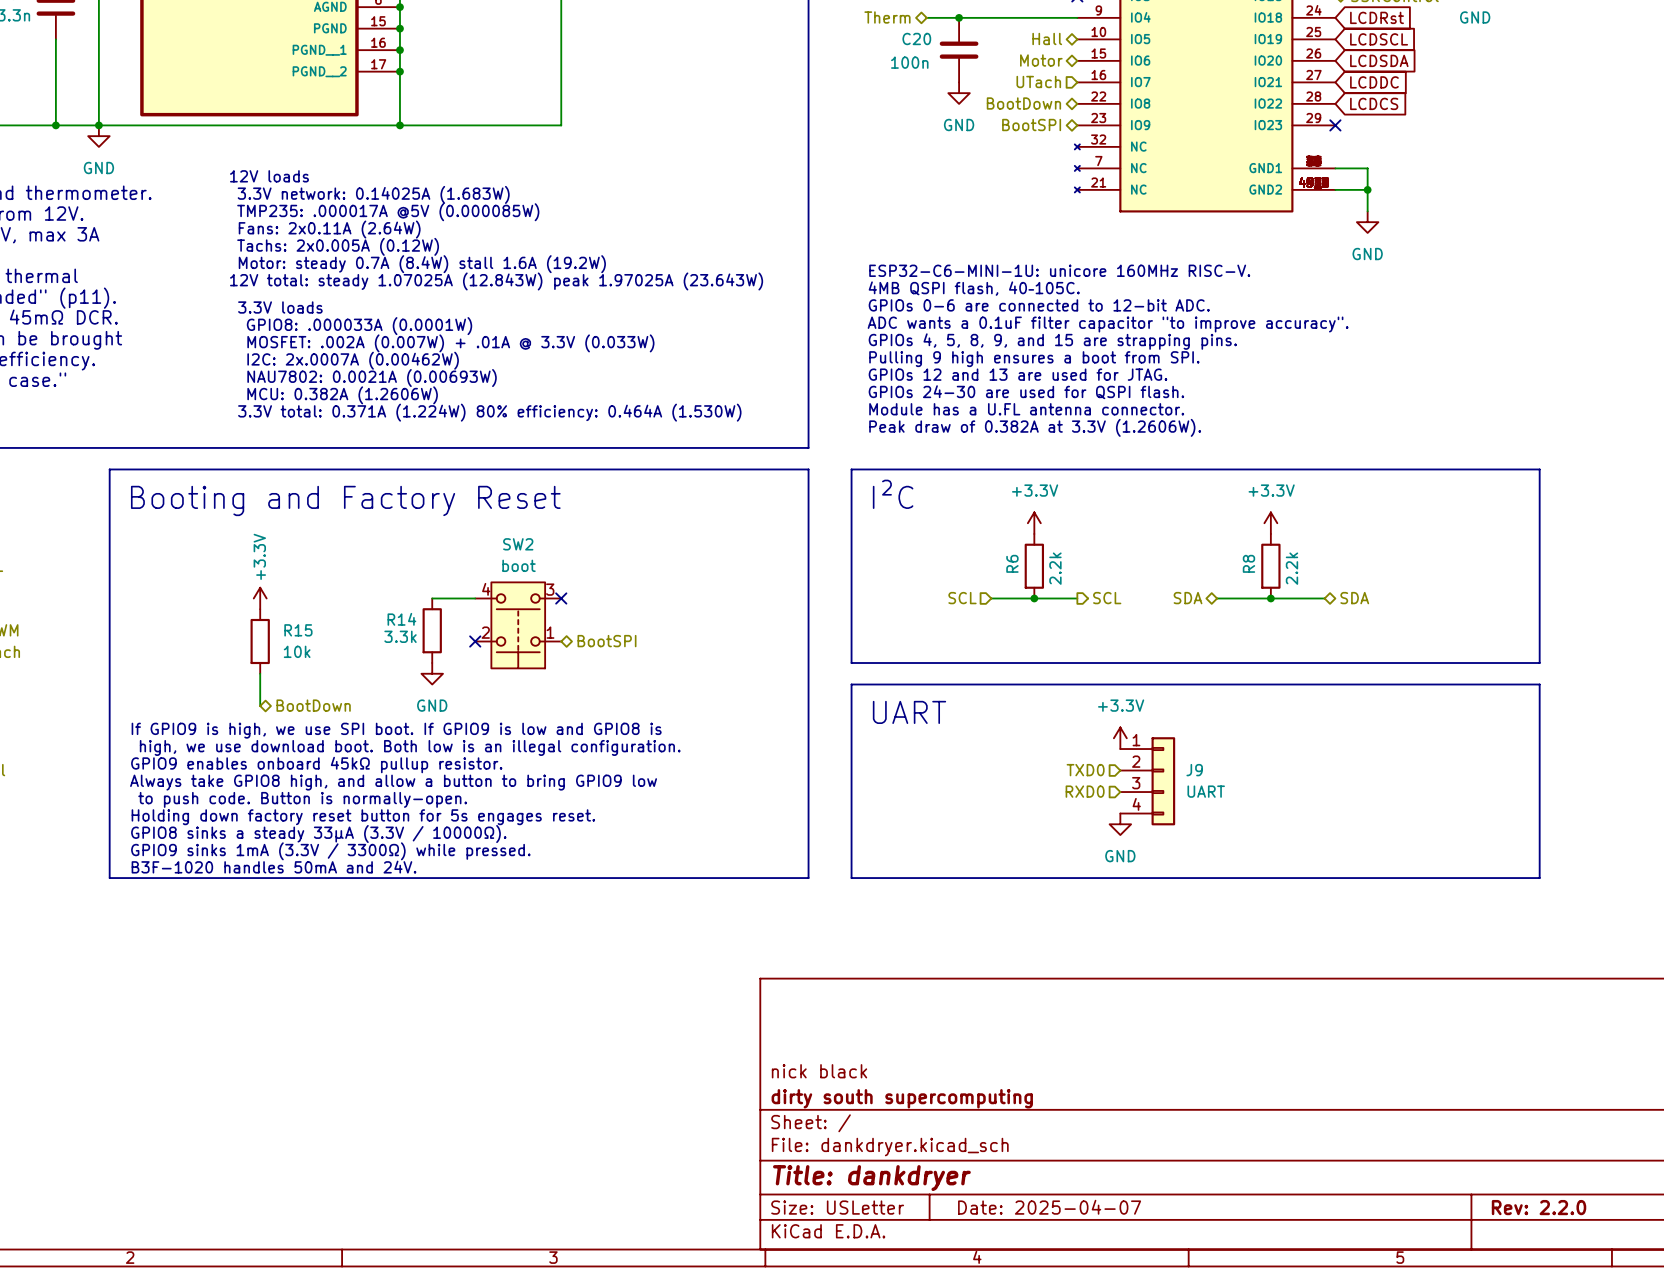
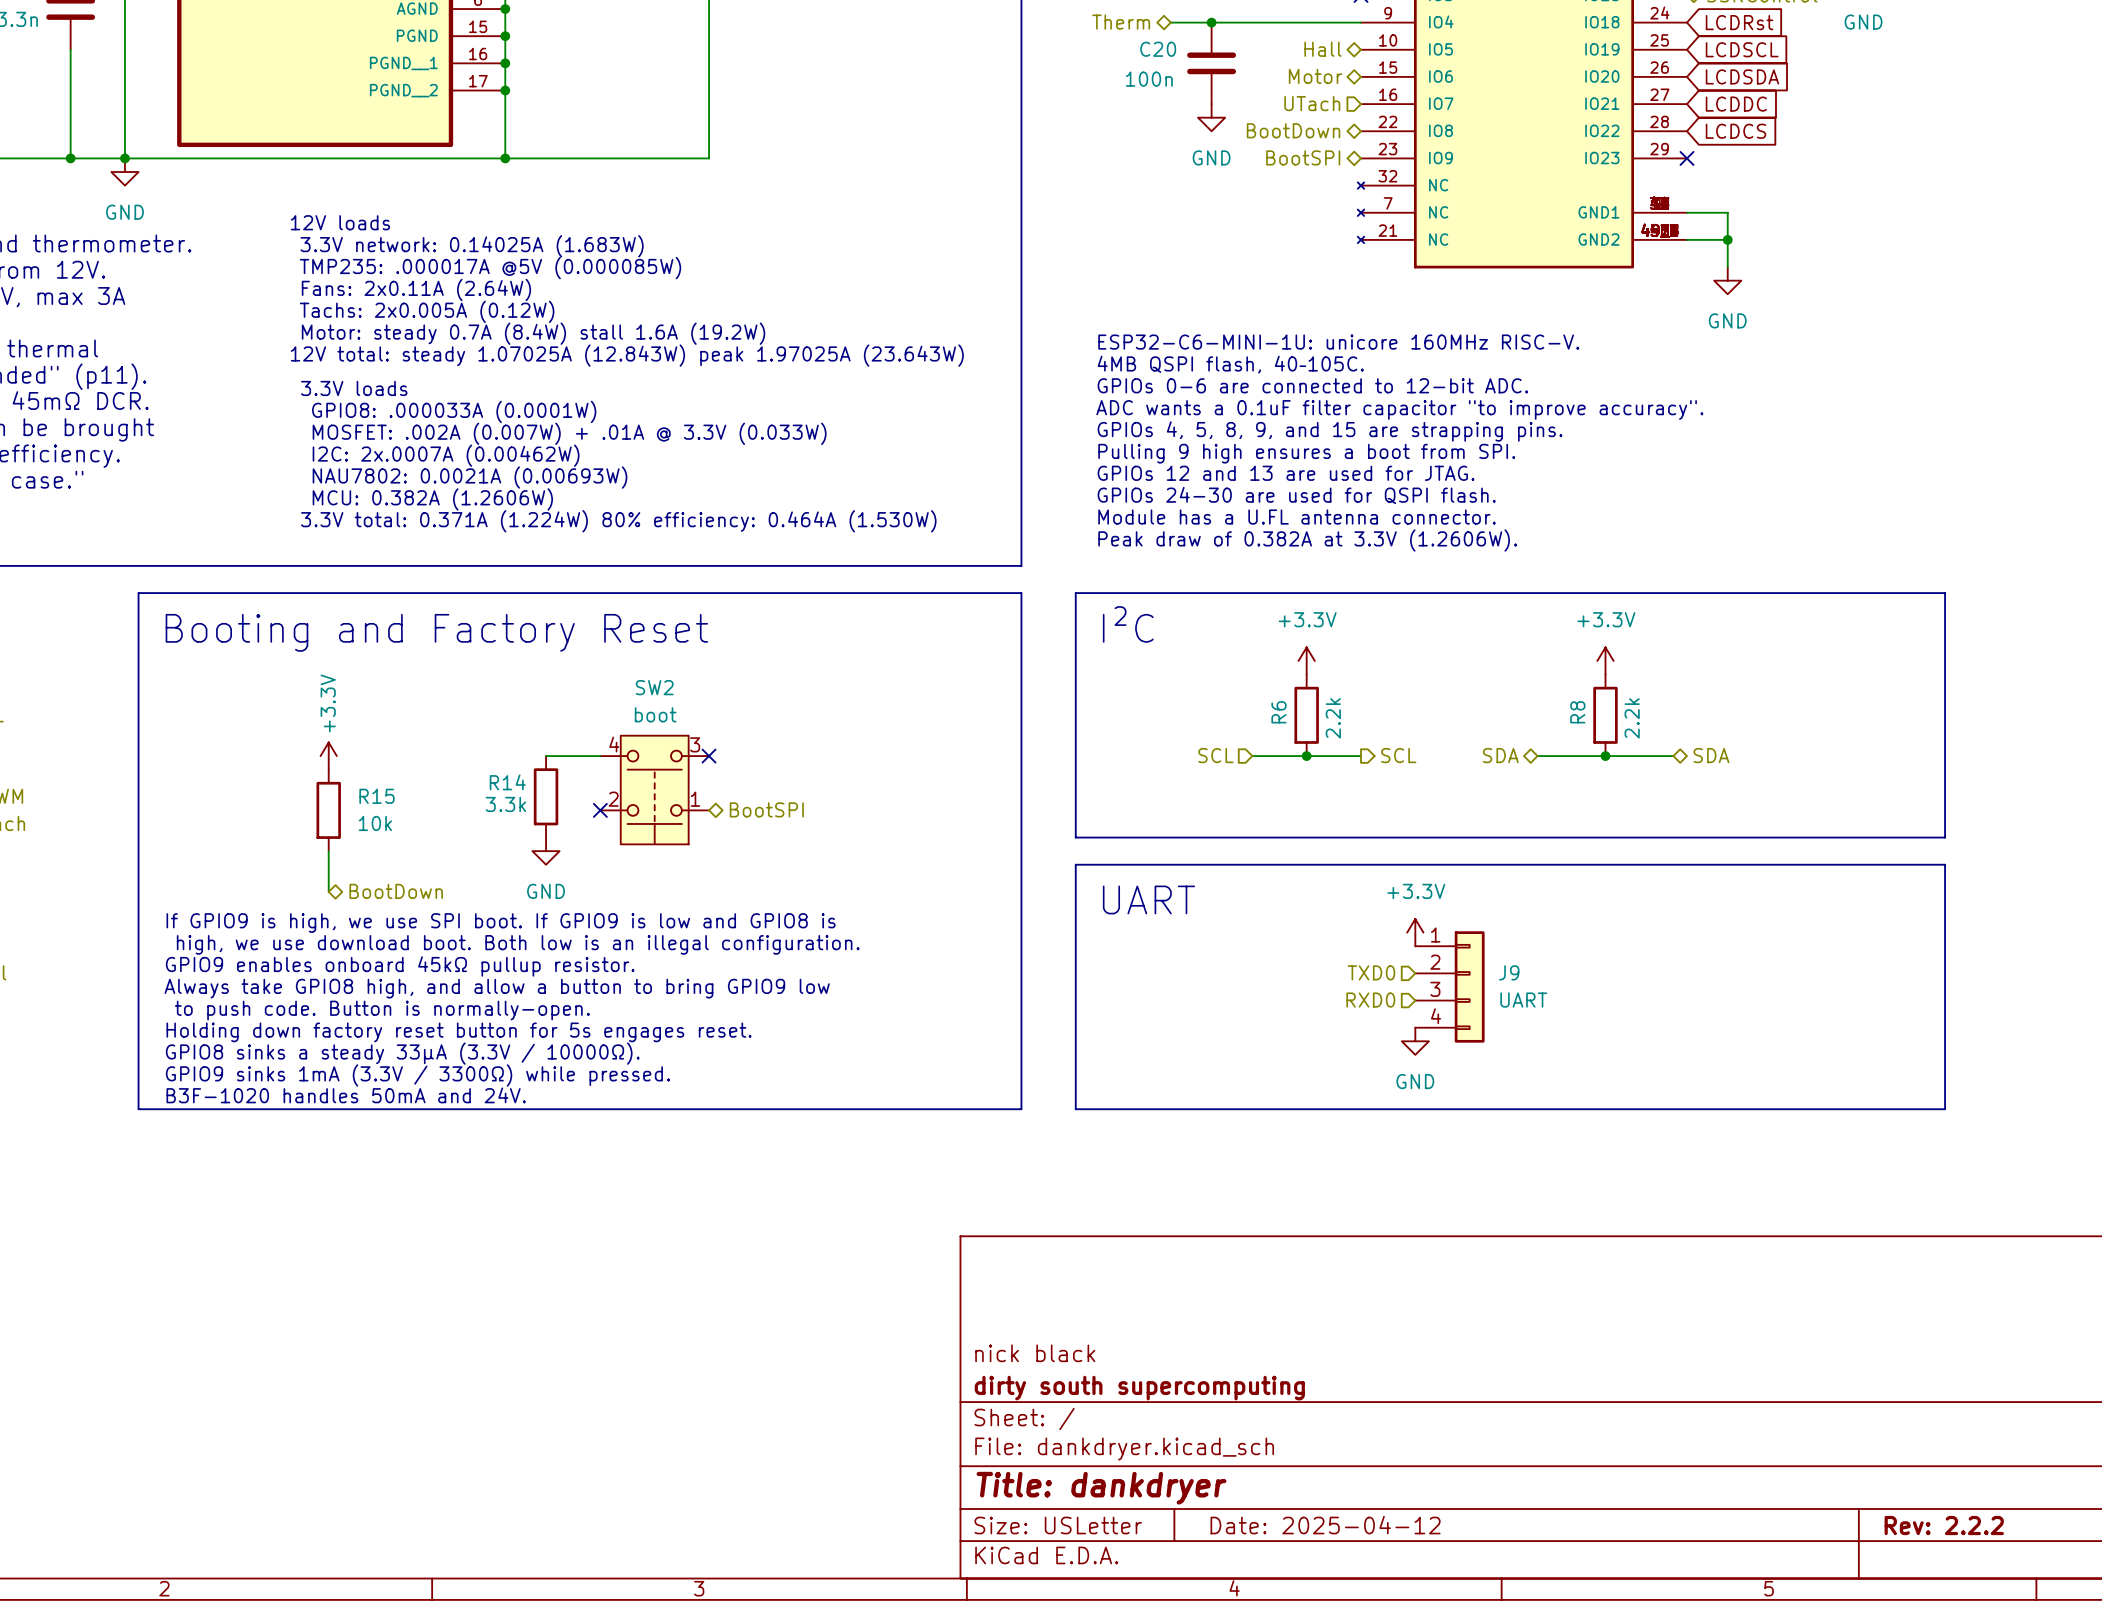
title block: Date: 2025-04-07 (1049, 1207) -> Date: 2025-04-12 (1325, 1525)
title block: Rev: 2.2.0 (1539, 1207) -> Rev: 2.2.2 (1944, 1525)

